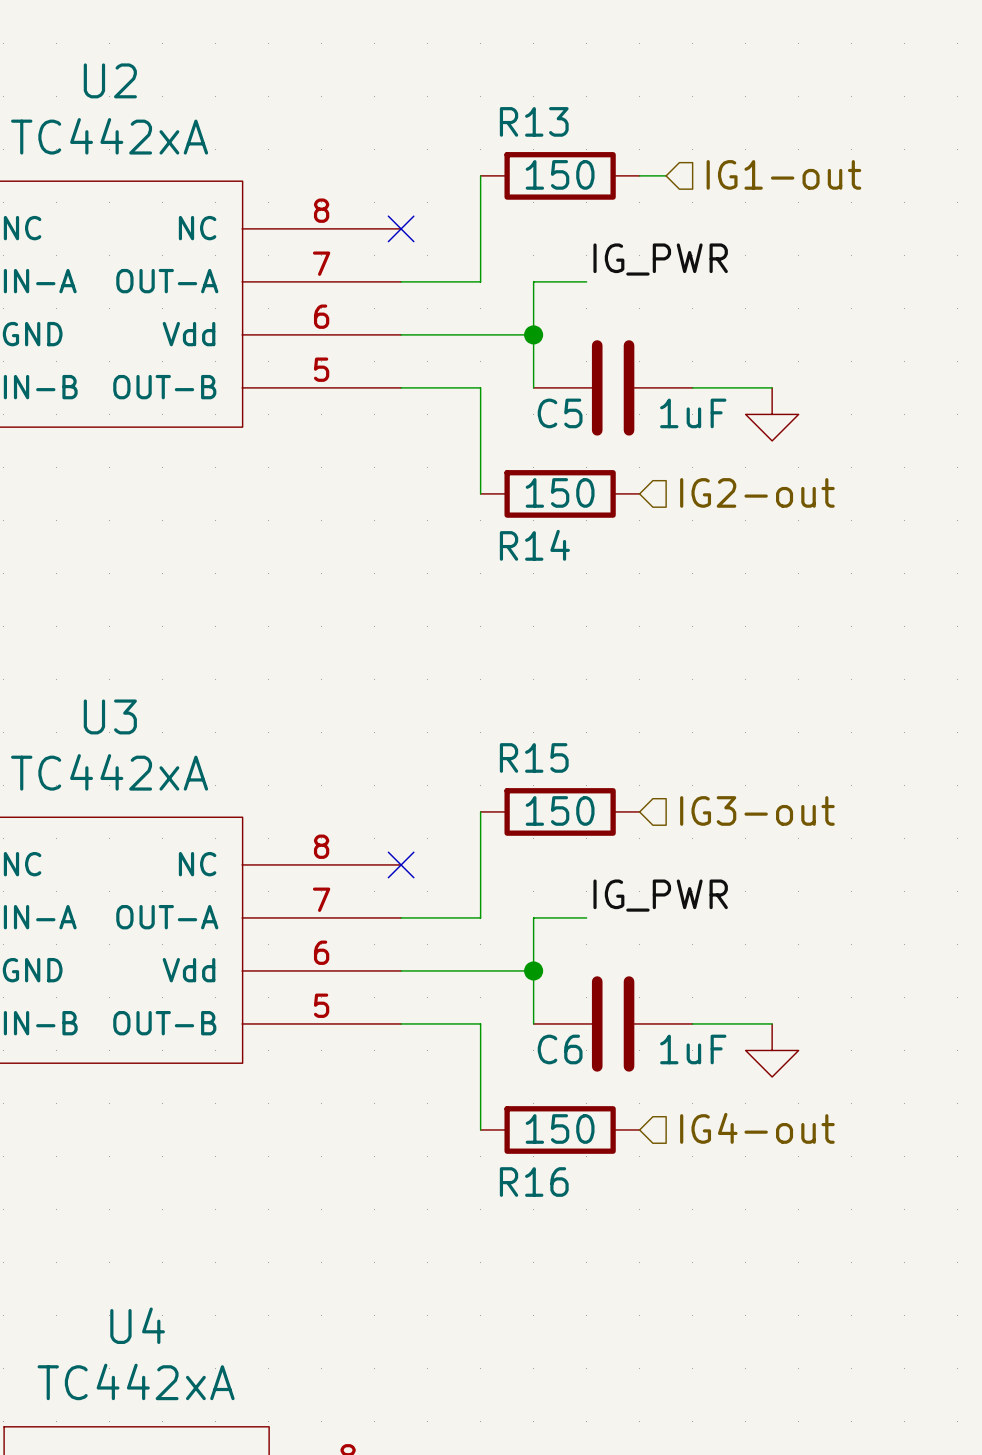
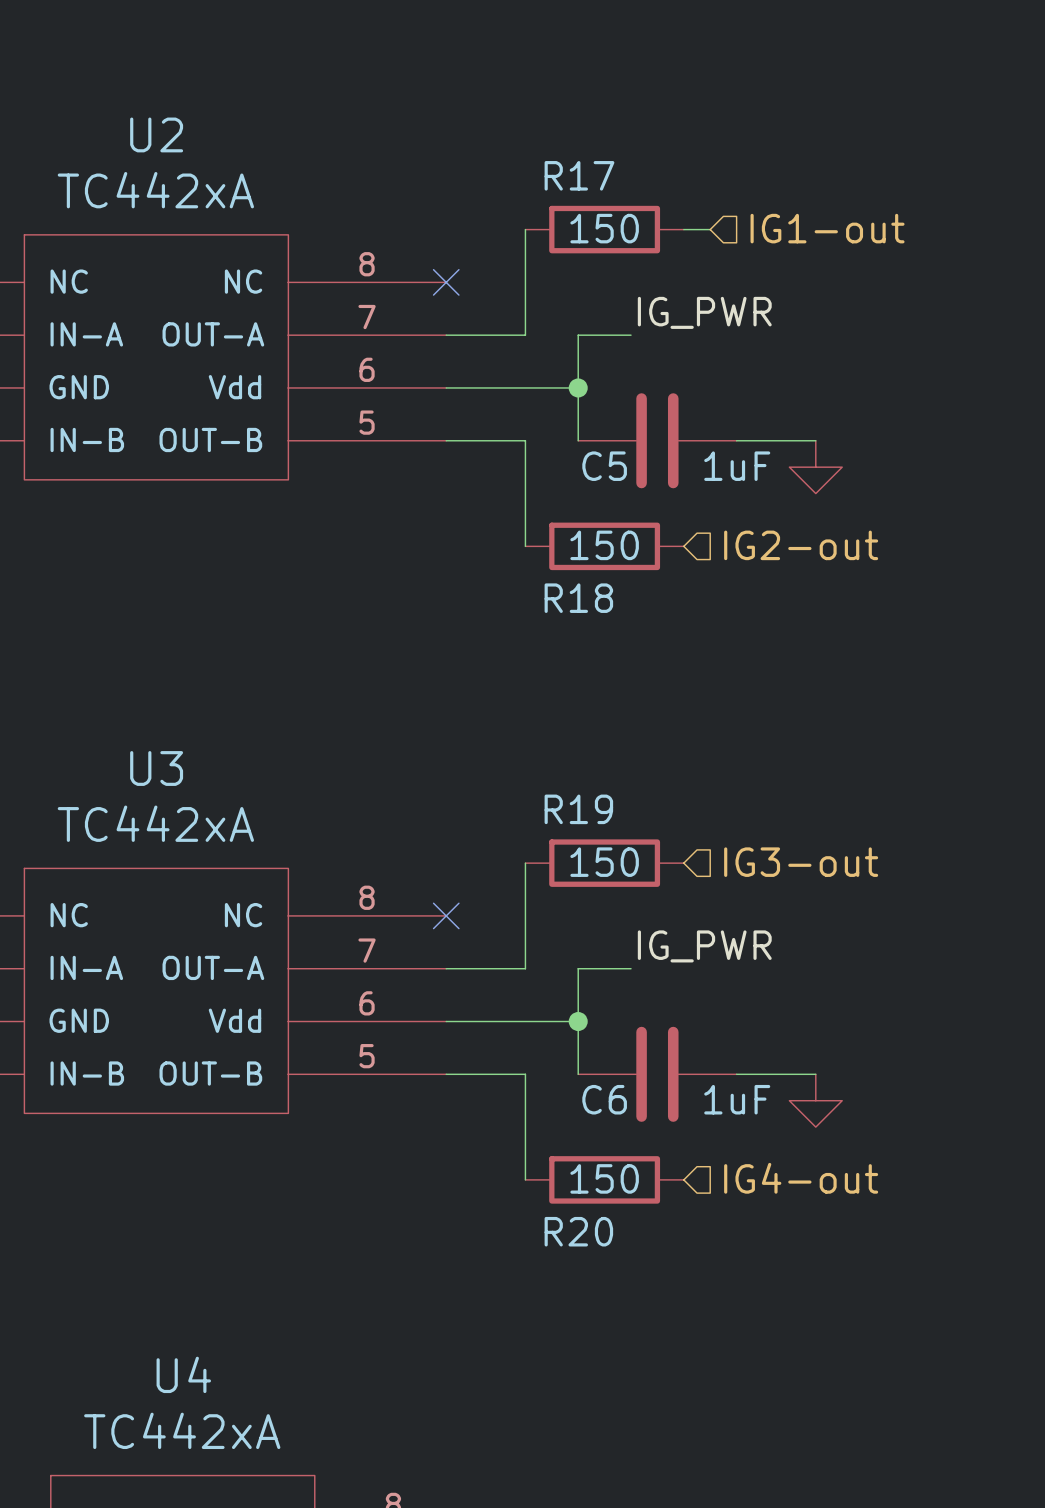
R13 name: R13 (534, 121) -> R17 (579, 175)
R14 name: R14 (534, 545) -> R18 (578, 598)
R15 name: R15 (534, 757) -> R19 (578, 809)
R16 name: R16 (534, 1182) -> R20 (578, 1231)

